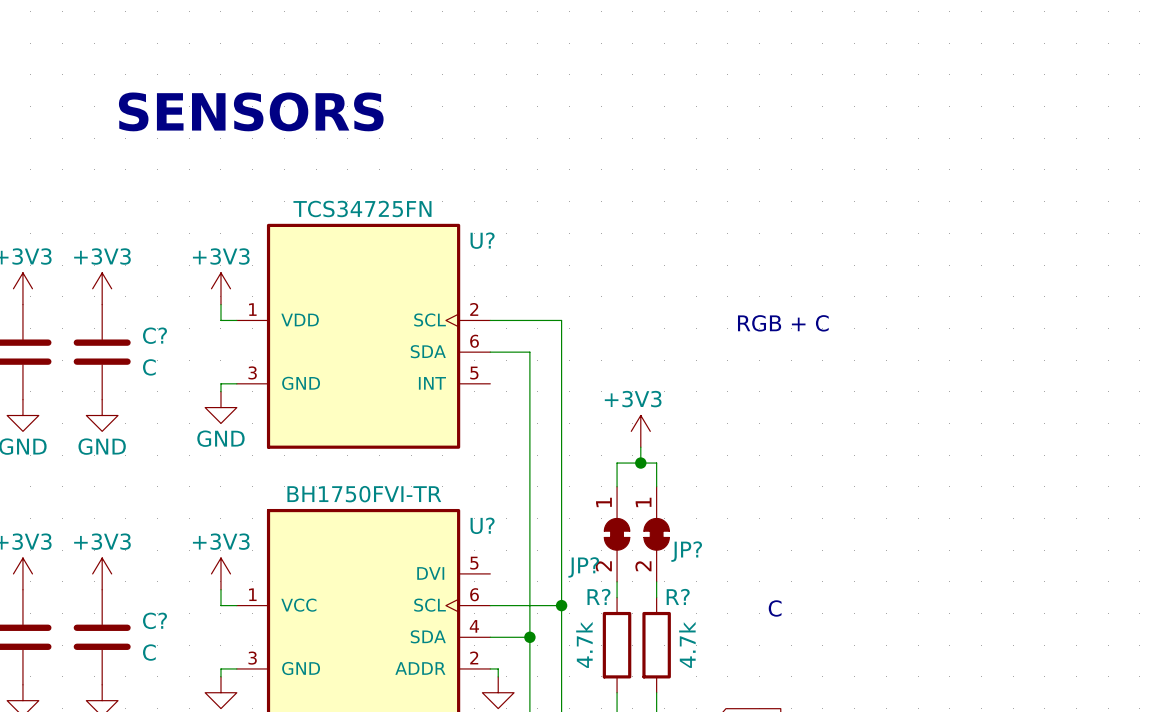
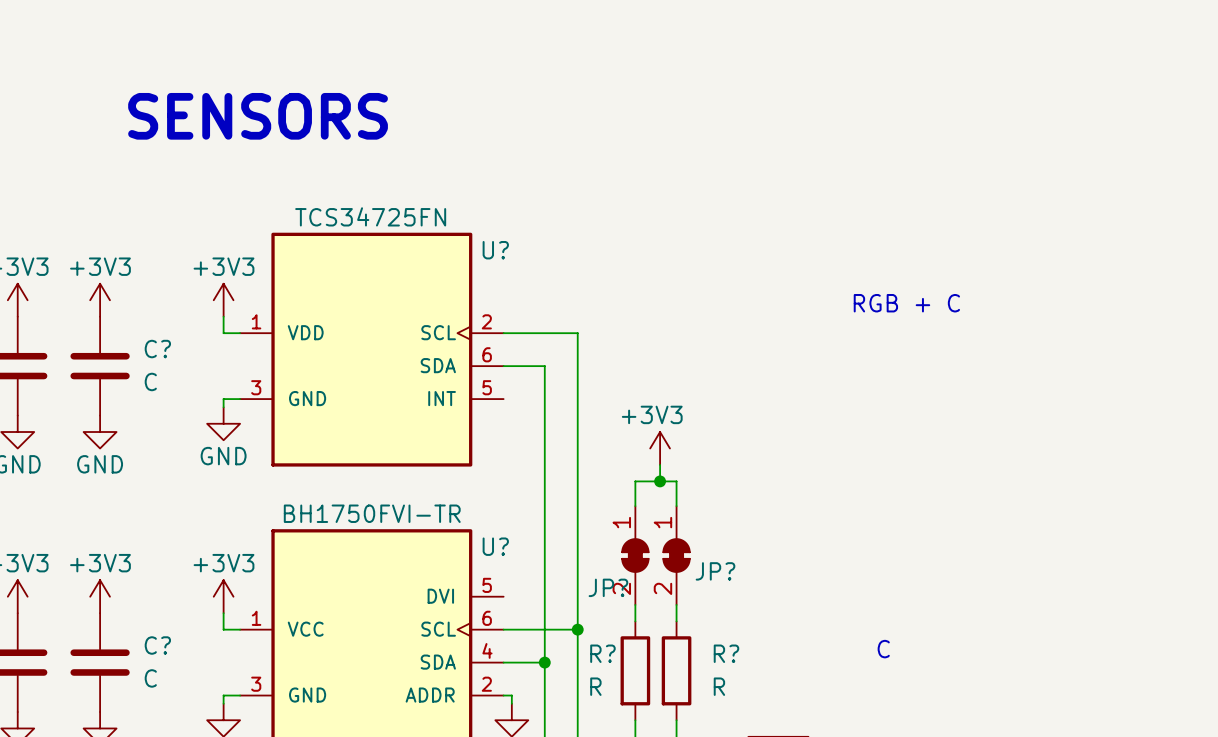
text position: RGB + C (783, 323) -> RGB + C (906, 303)
R? name position: R? (598, 596) -> R? (602, 653)
R? name position: R? (678, 596) -> R? (726, 653)
text position: C (775, 608) -> C (883, 649)
R? value: 4.7k (584, 644) -> R (595, 686)
R? value: 4.7k (687, 644) -> R (719, 686)

